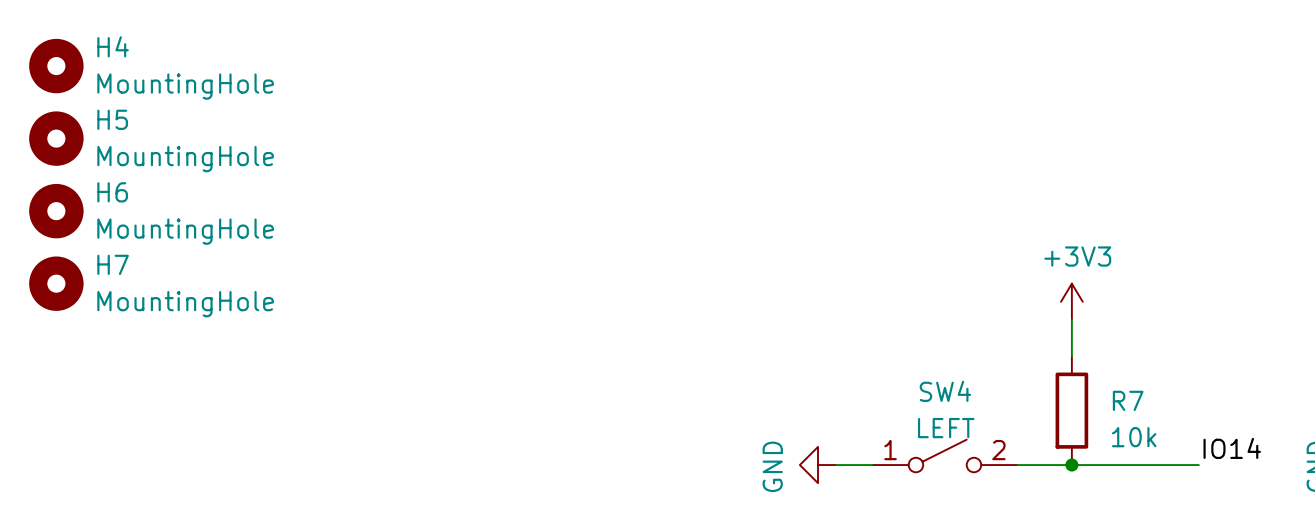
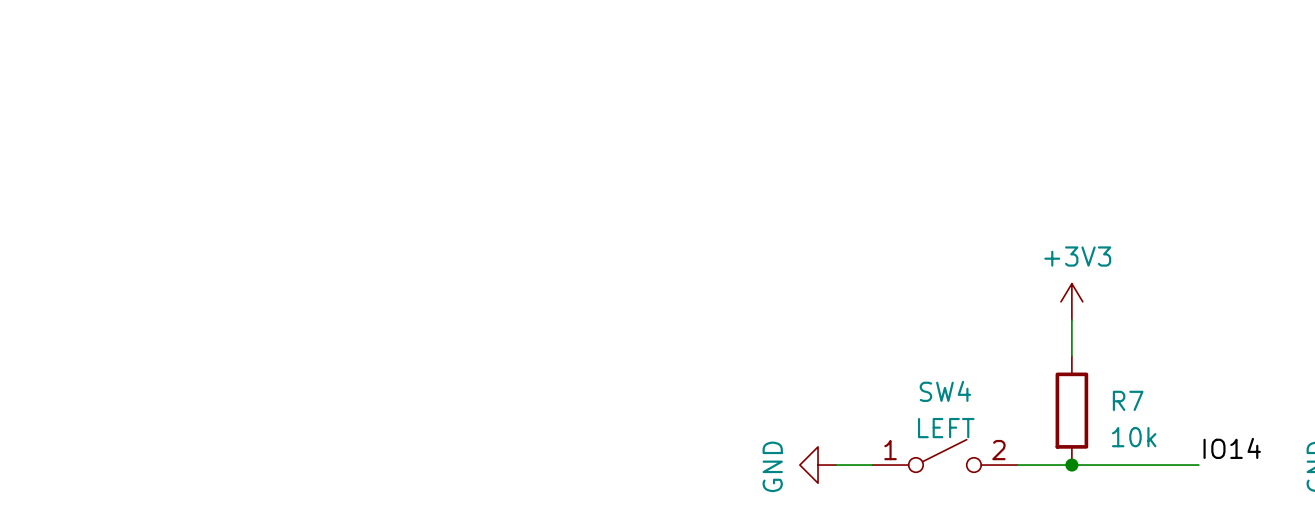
H4: MountingHole (56, 66) -> none
H5: MountingHole (56, 138) -> none
H6: MountingHole (56, 211) -> none
H7: MountingHole (56, 283) -> none

